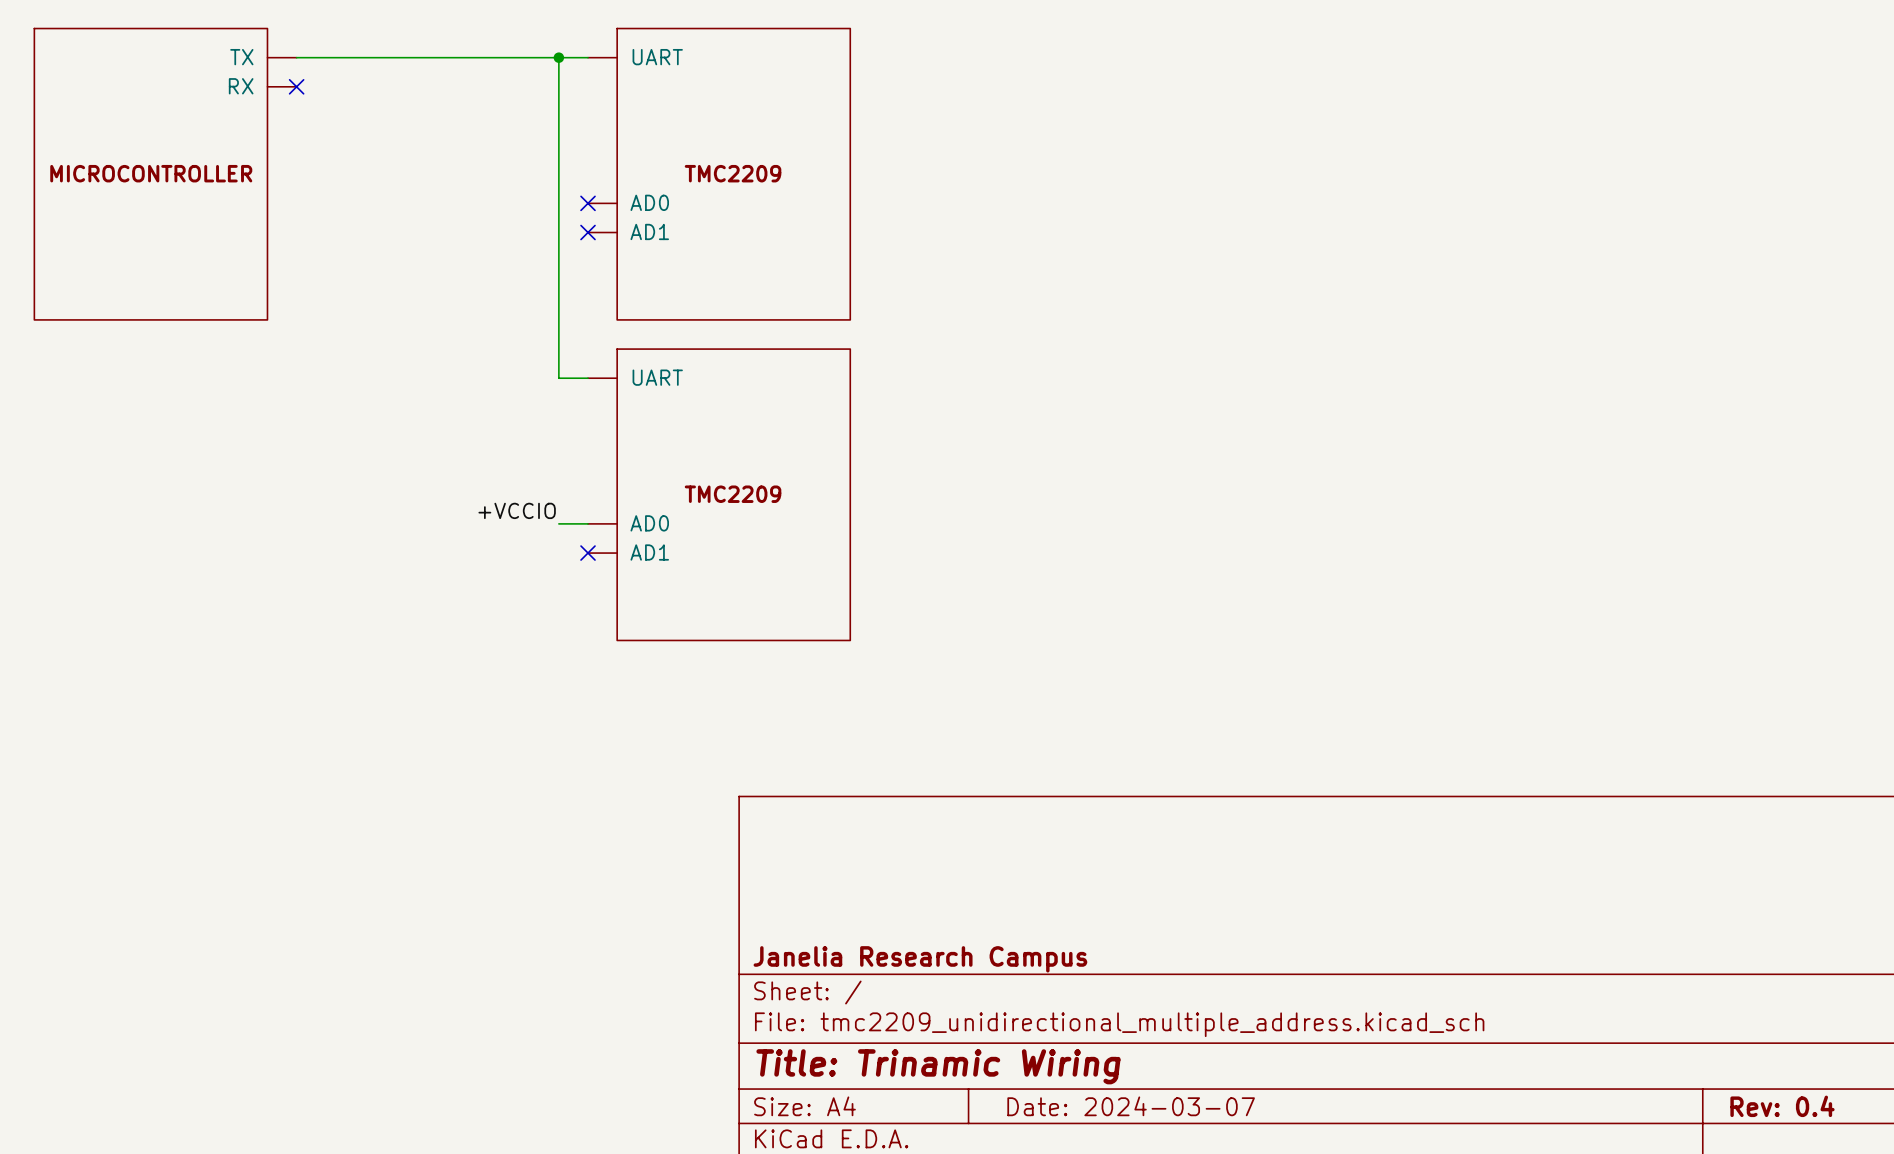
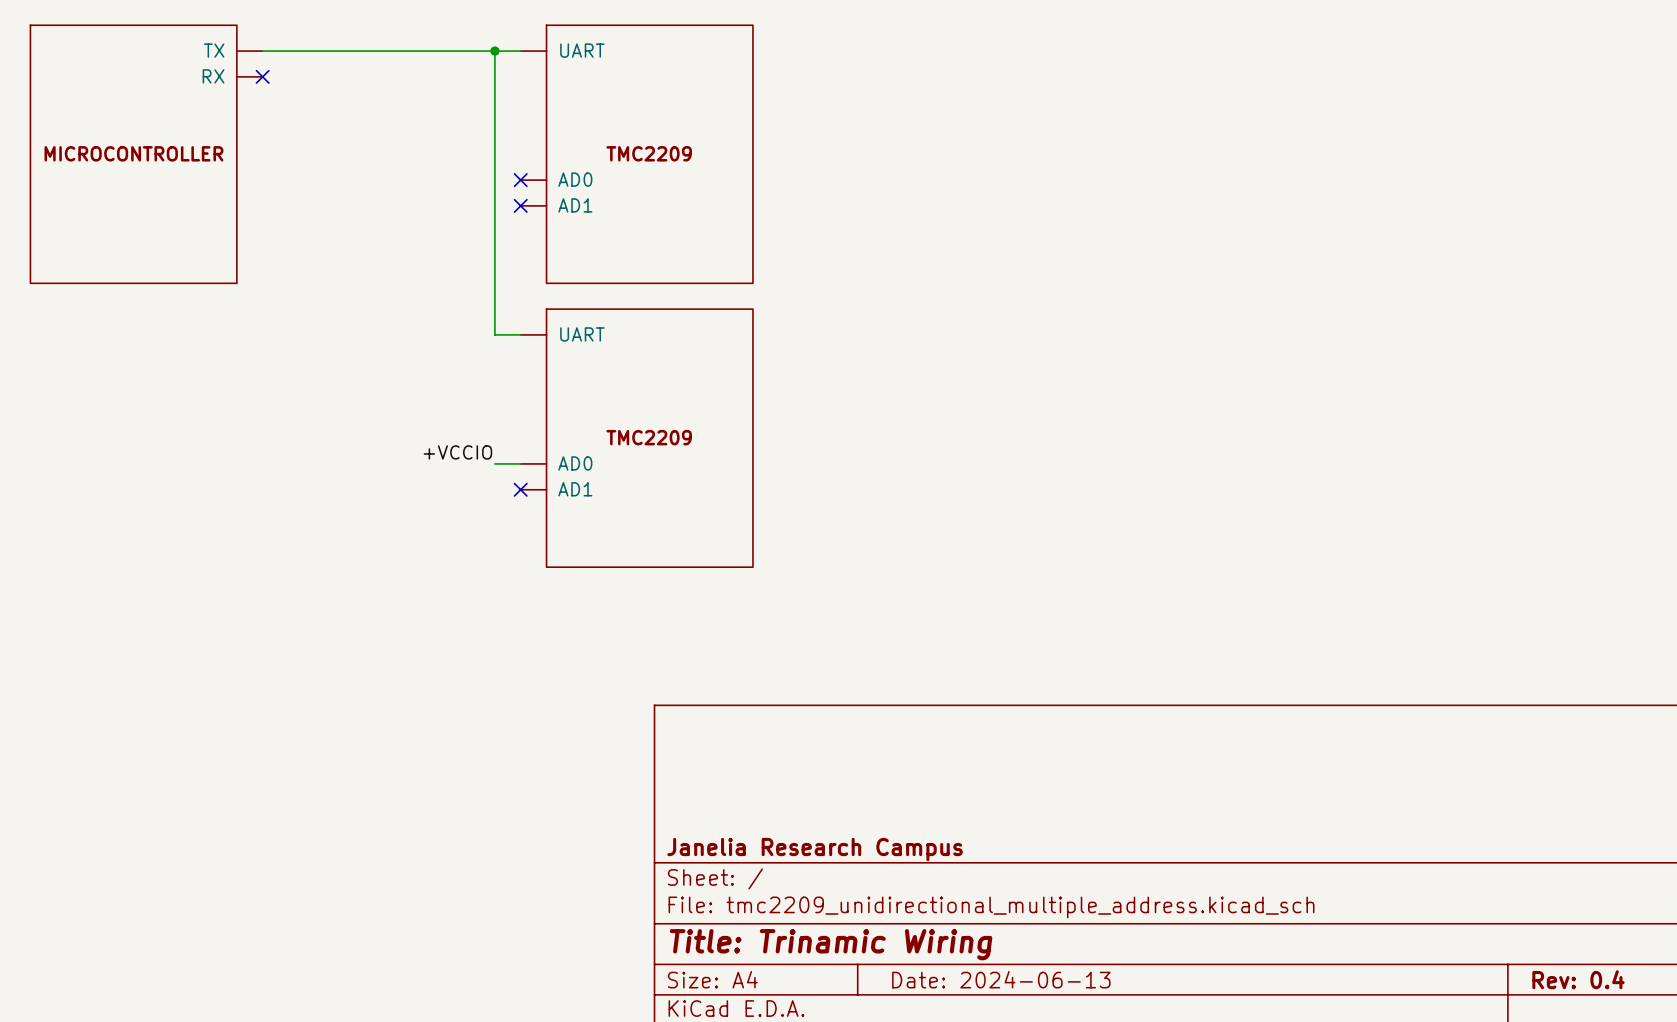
title block: Date: 2024-03-07 (1131, 1106) -> Date: 2024-06-13 (1001, 979)

